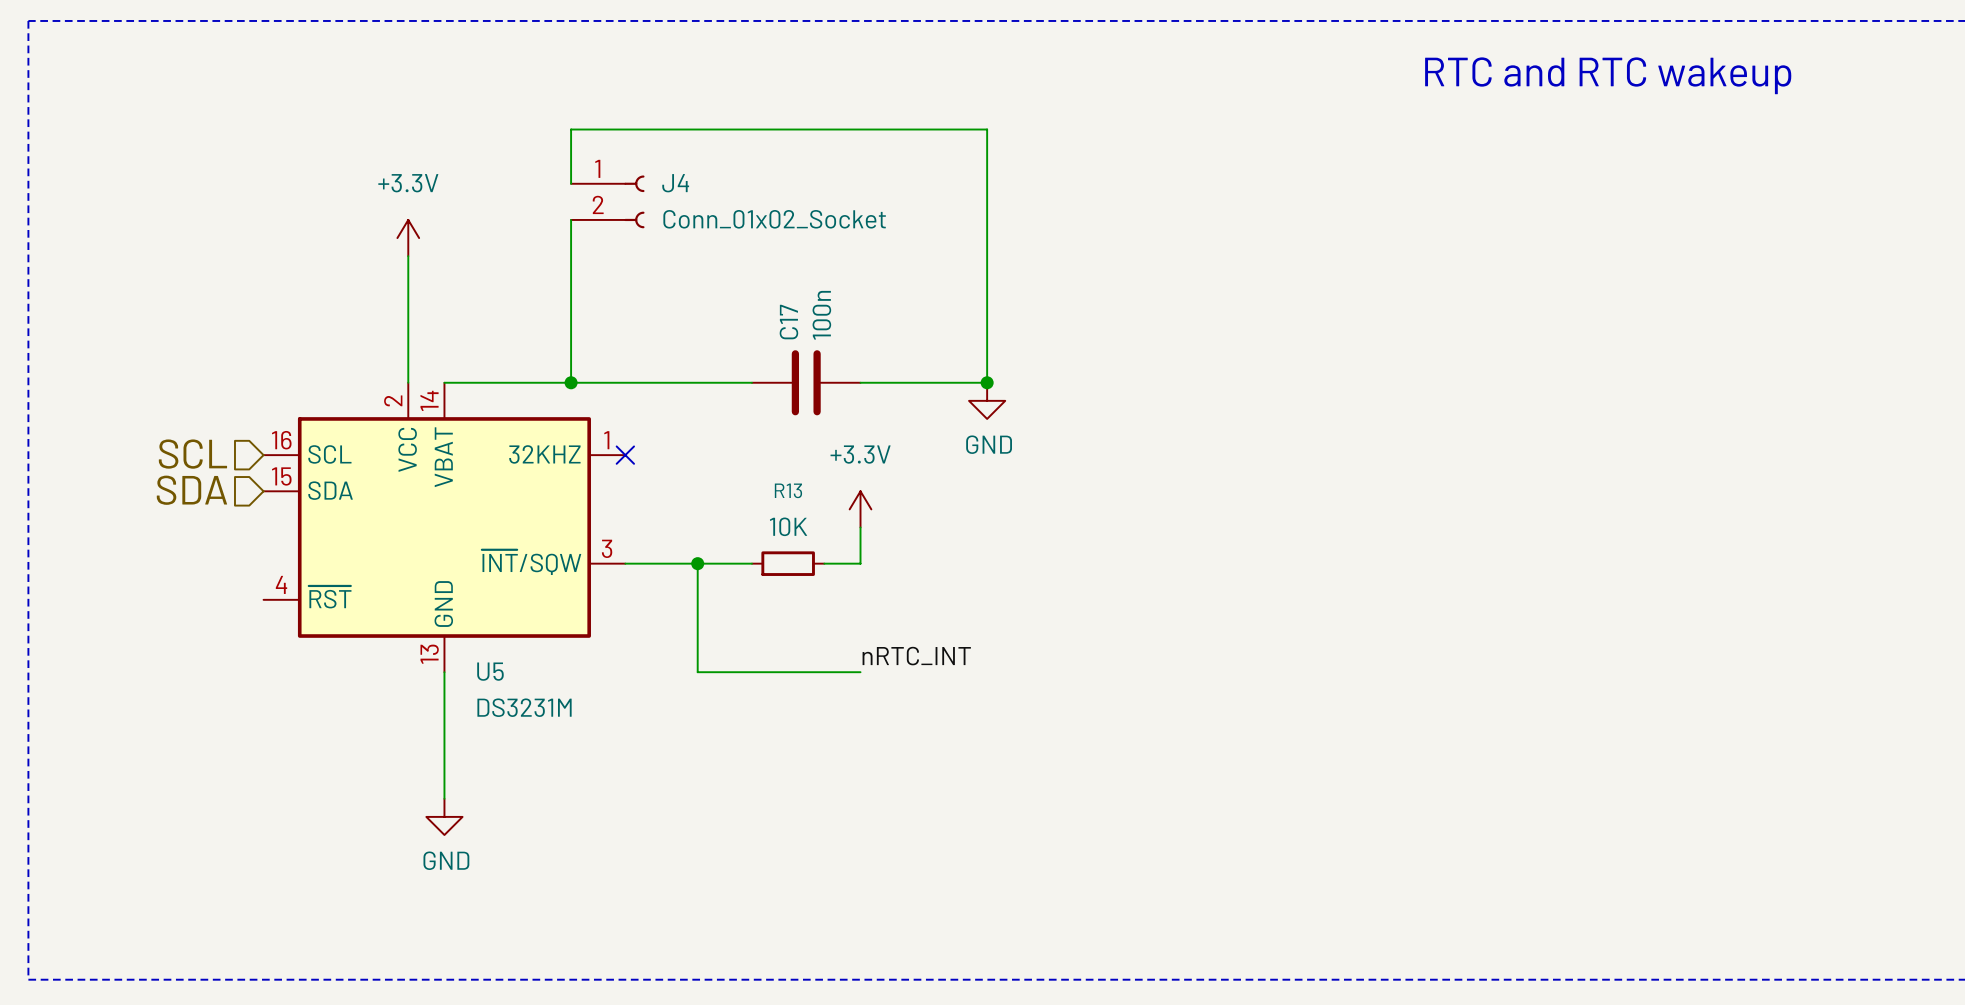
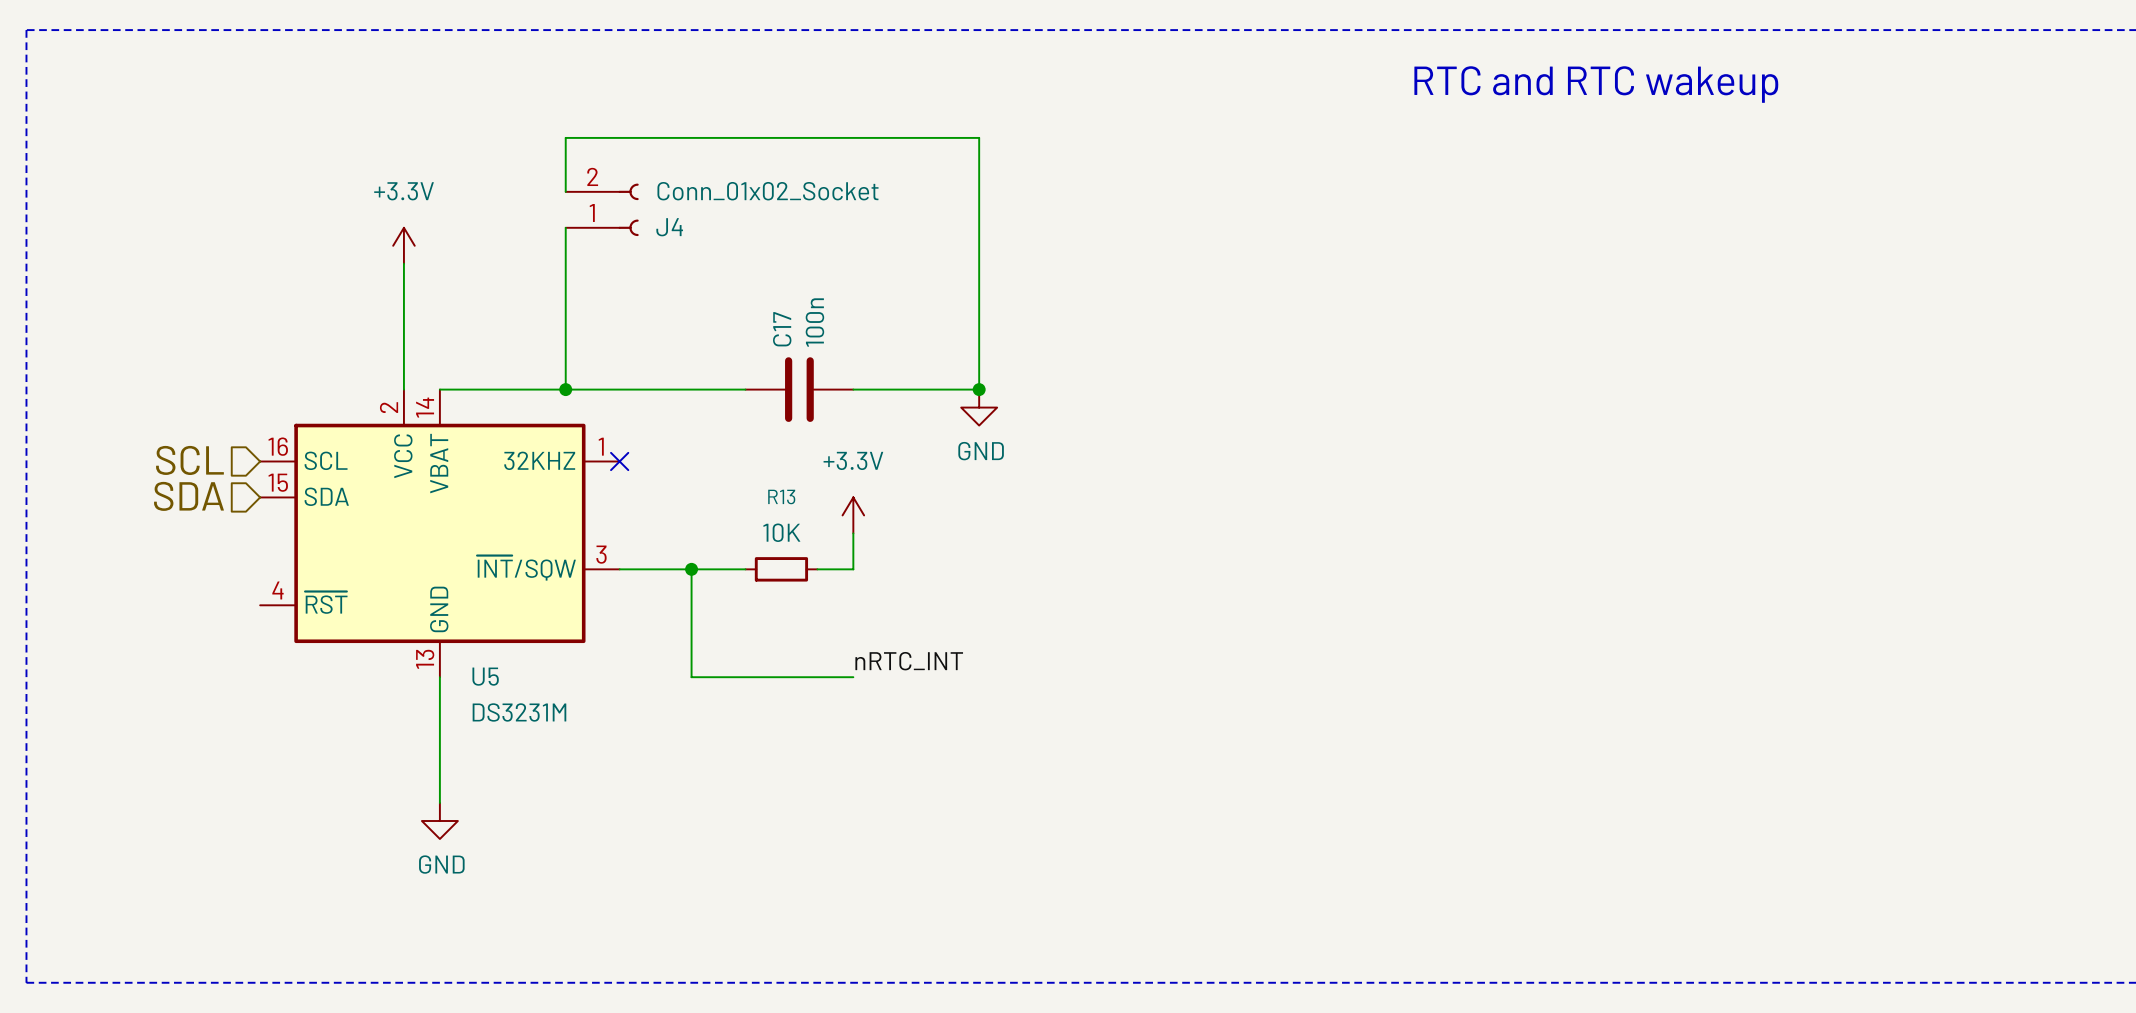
J4 flip: as is (634, 201) -> up-down (628, 209)

